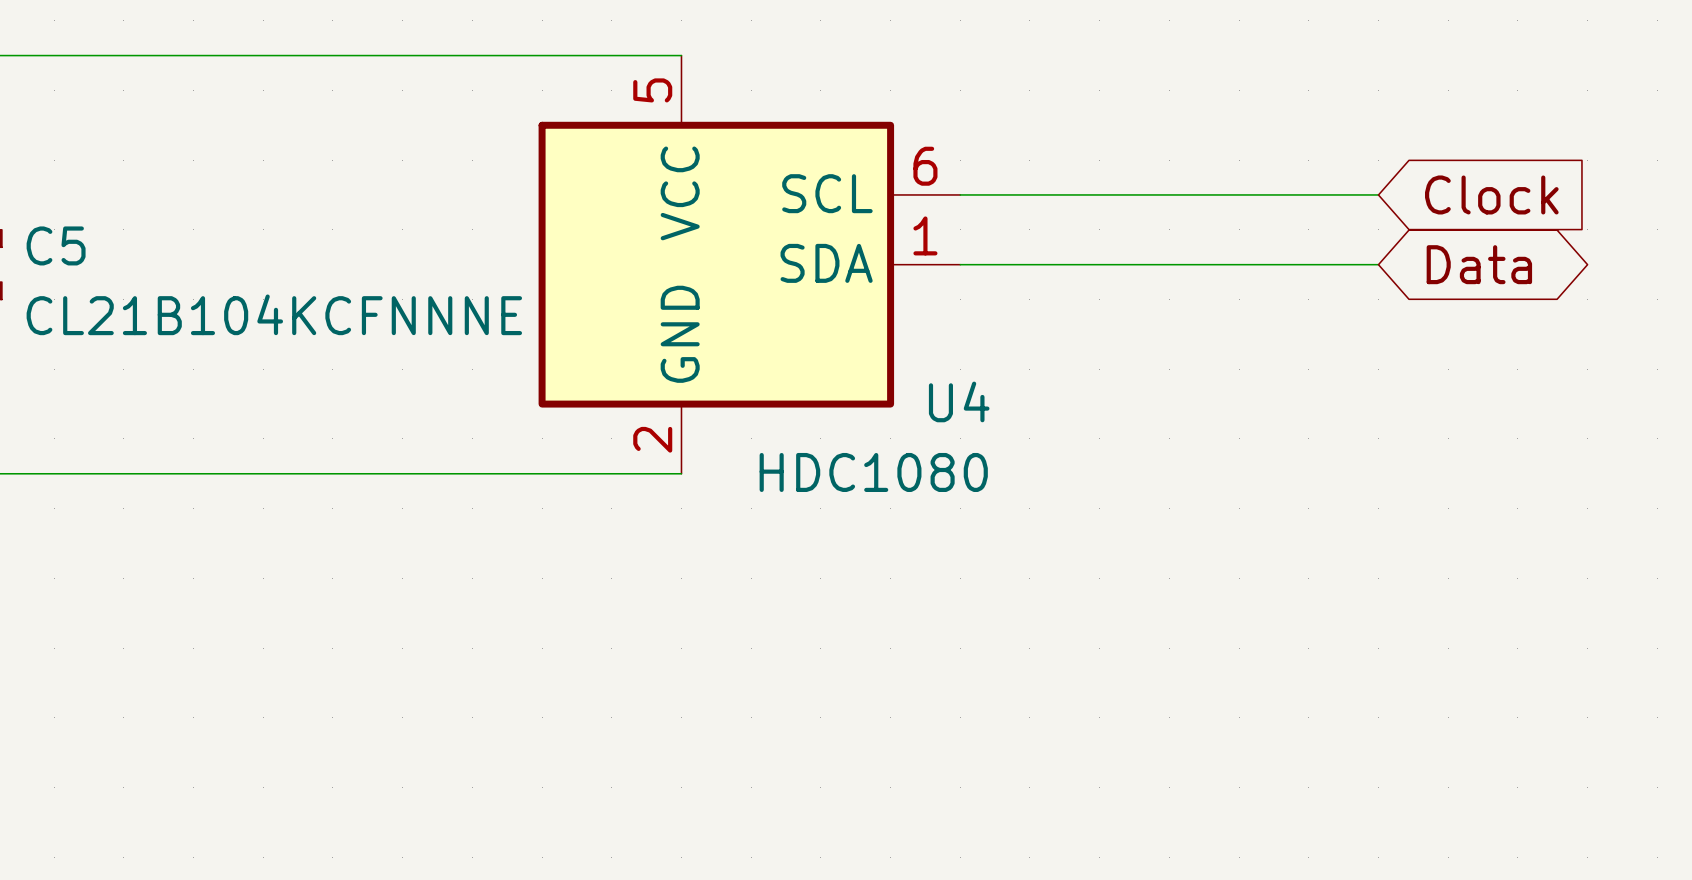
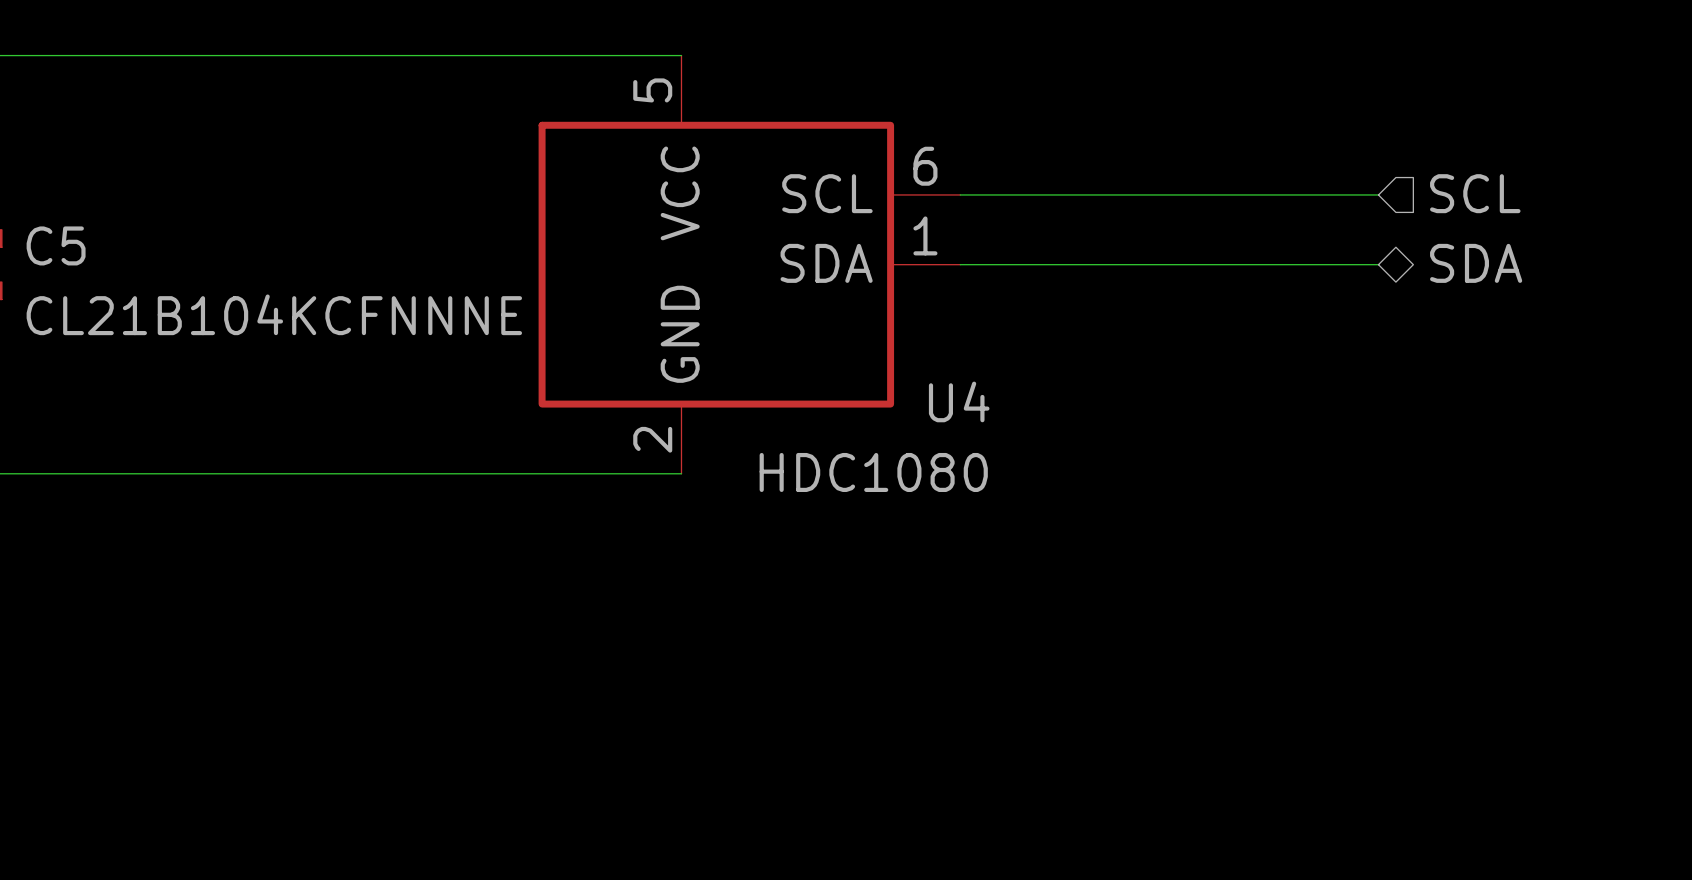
hierarchical label: none -> SCL (1475, 193)
global label: Clock (1491, 194) -> none
hierarchical label: none -> SDA (1476, 263)
global label: Data (1479, 264) -> none

